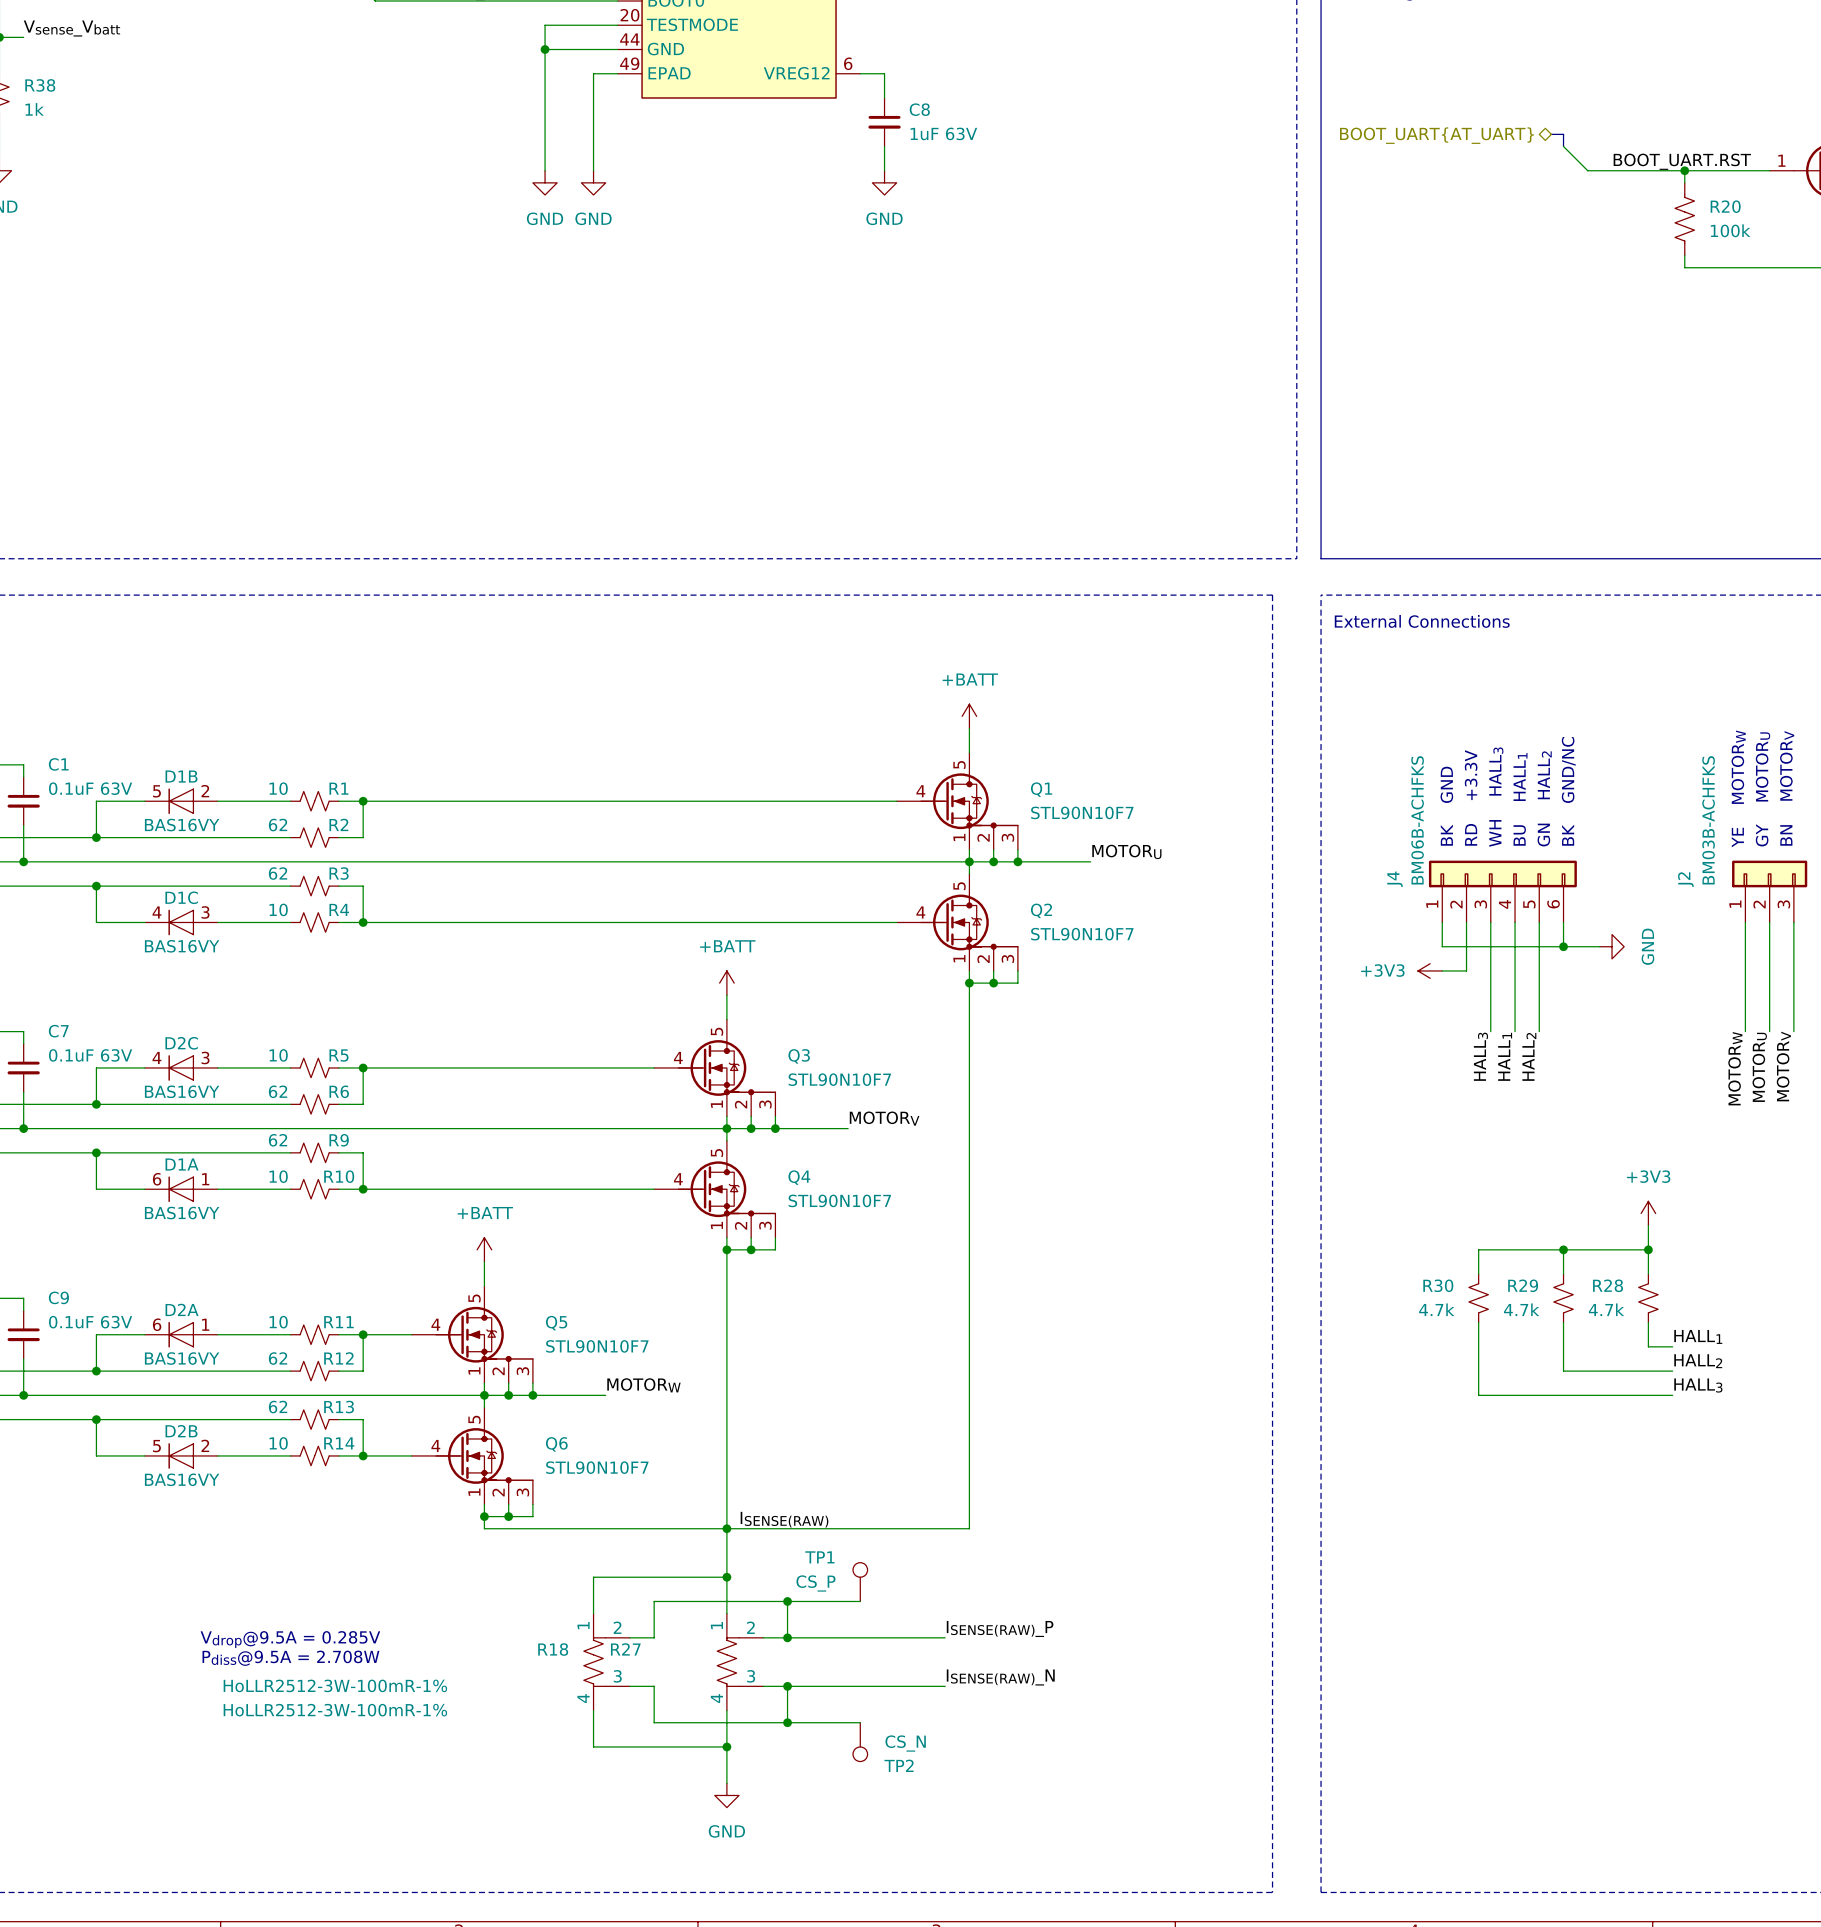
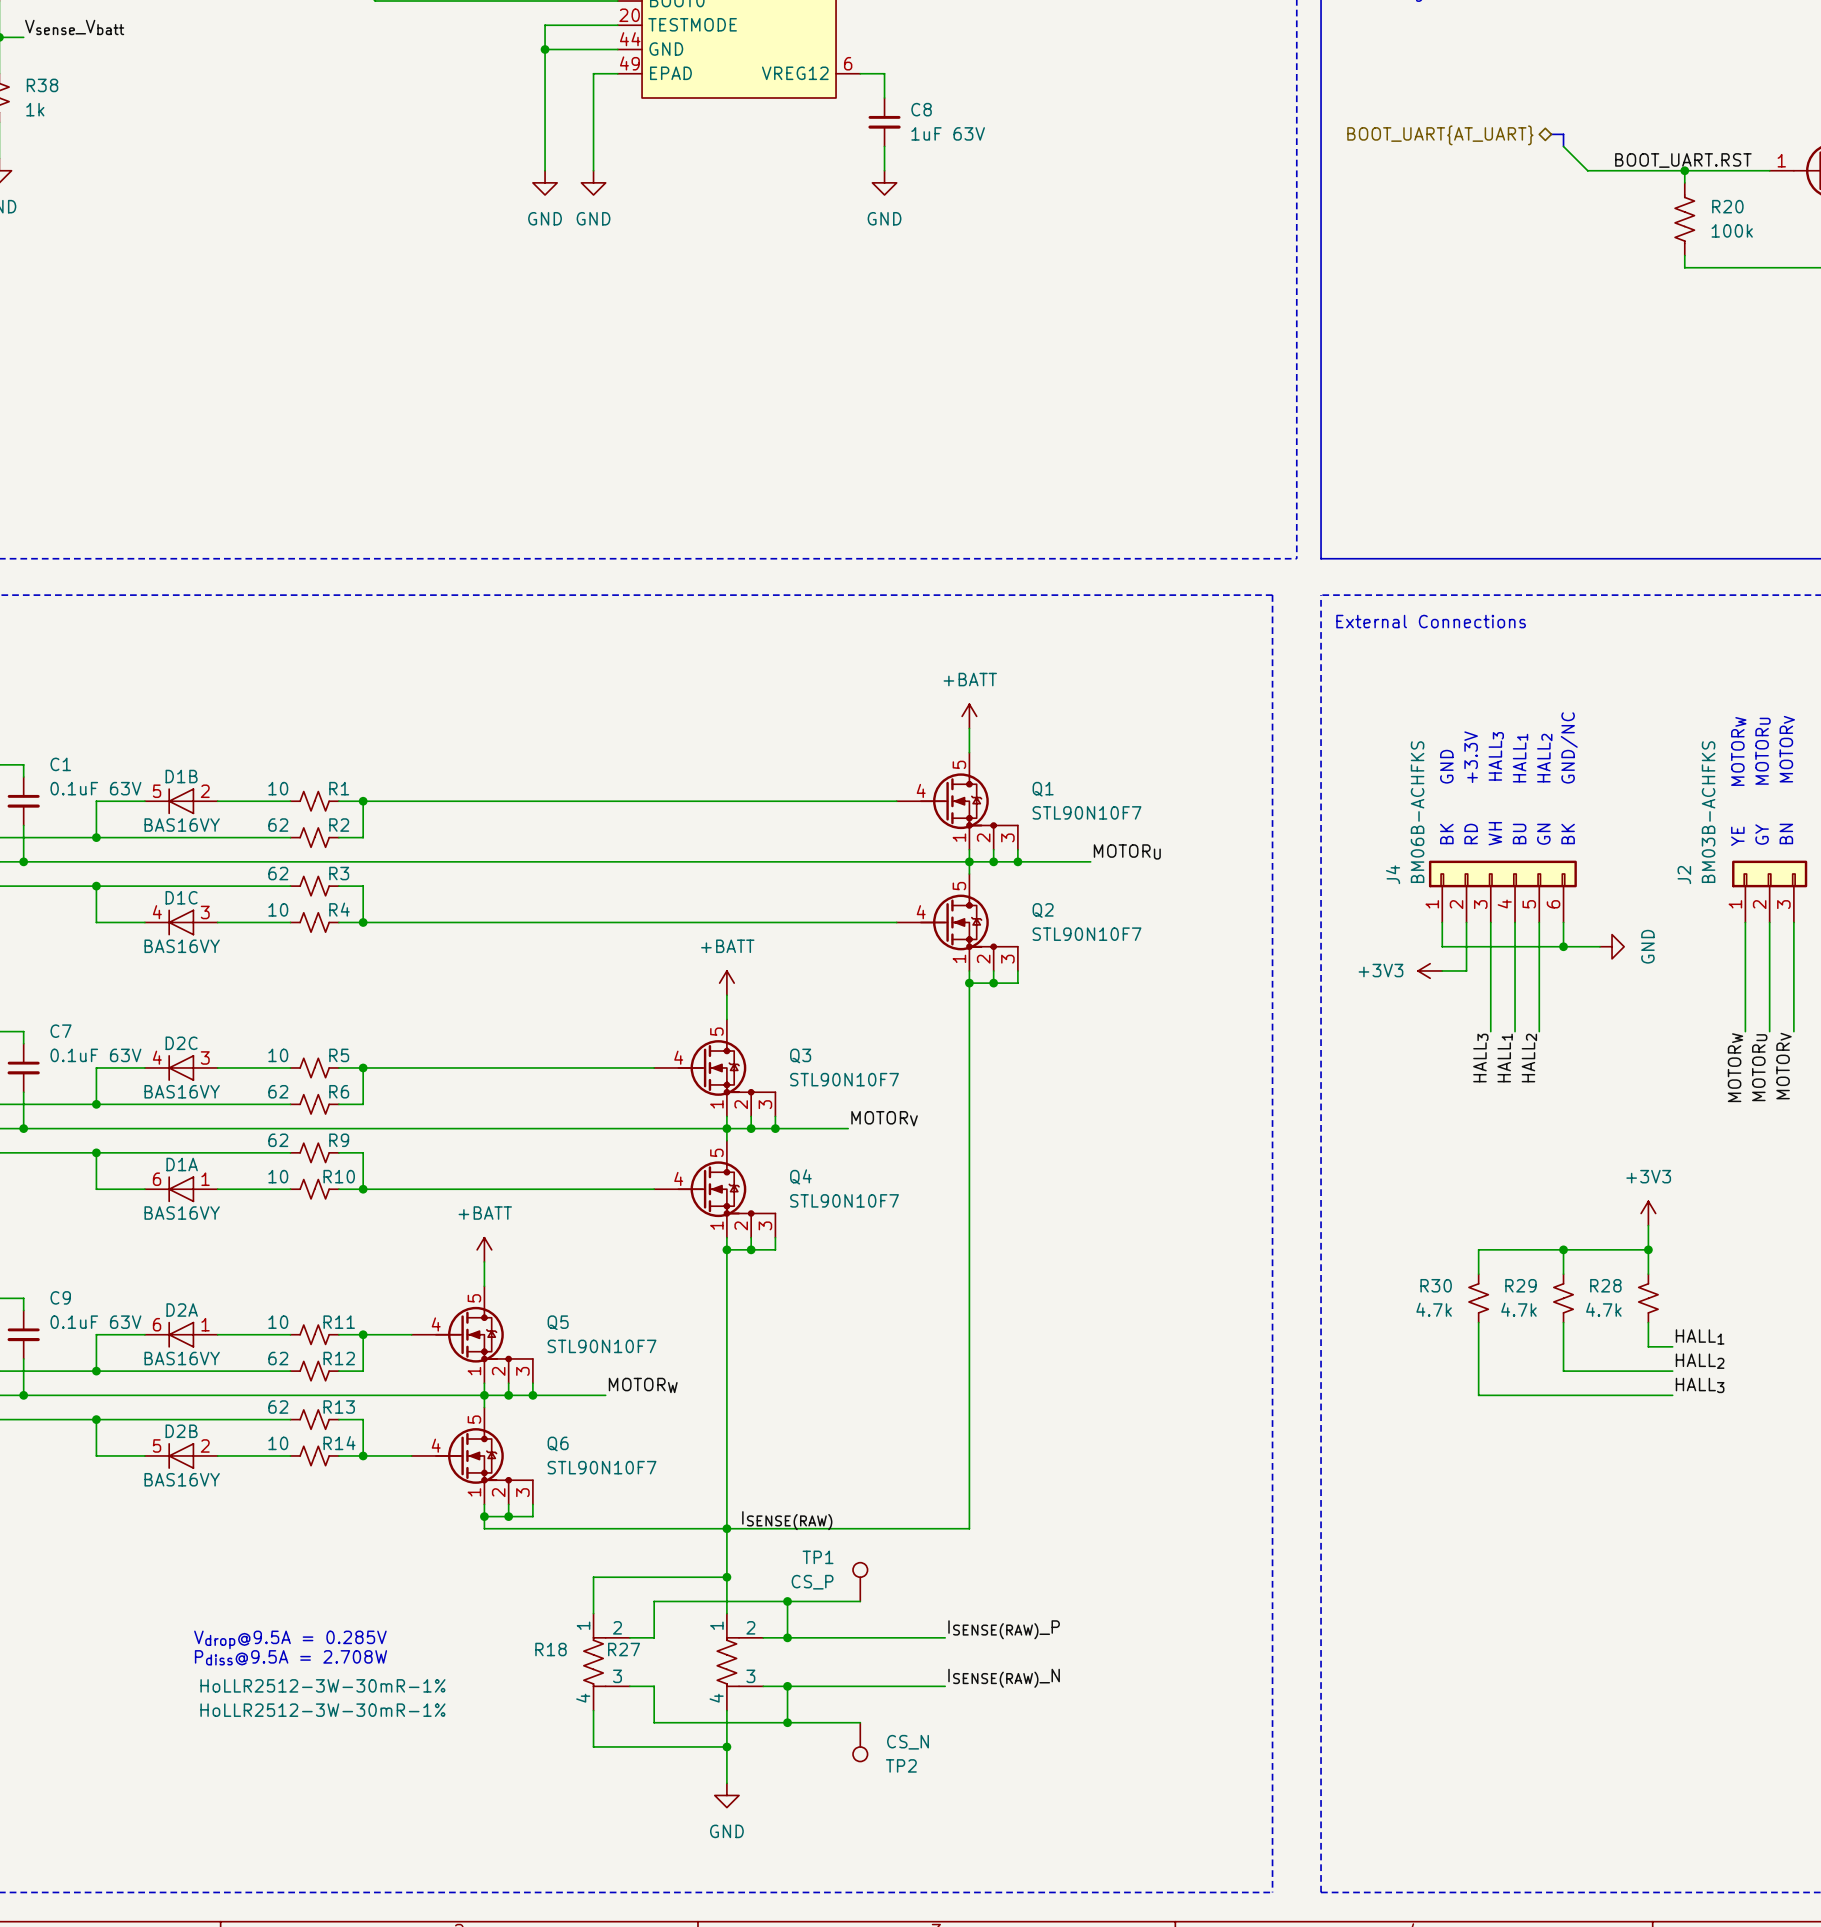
R18 value: HoLLR2512-3W-100mR-1% (335, 1685) -> HoLLR2512-3W-30mR-1% (322, 1685)
R27 value: HoLLR2512-3W-100mR-1% (335, 1710) -> HoLLR2512-3W-30mR-1% (322, 1710)

